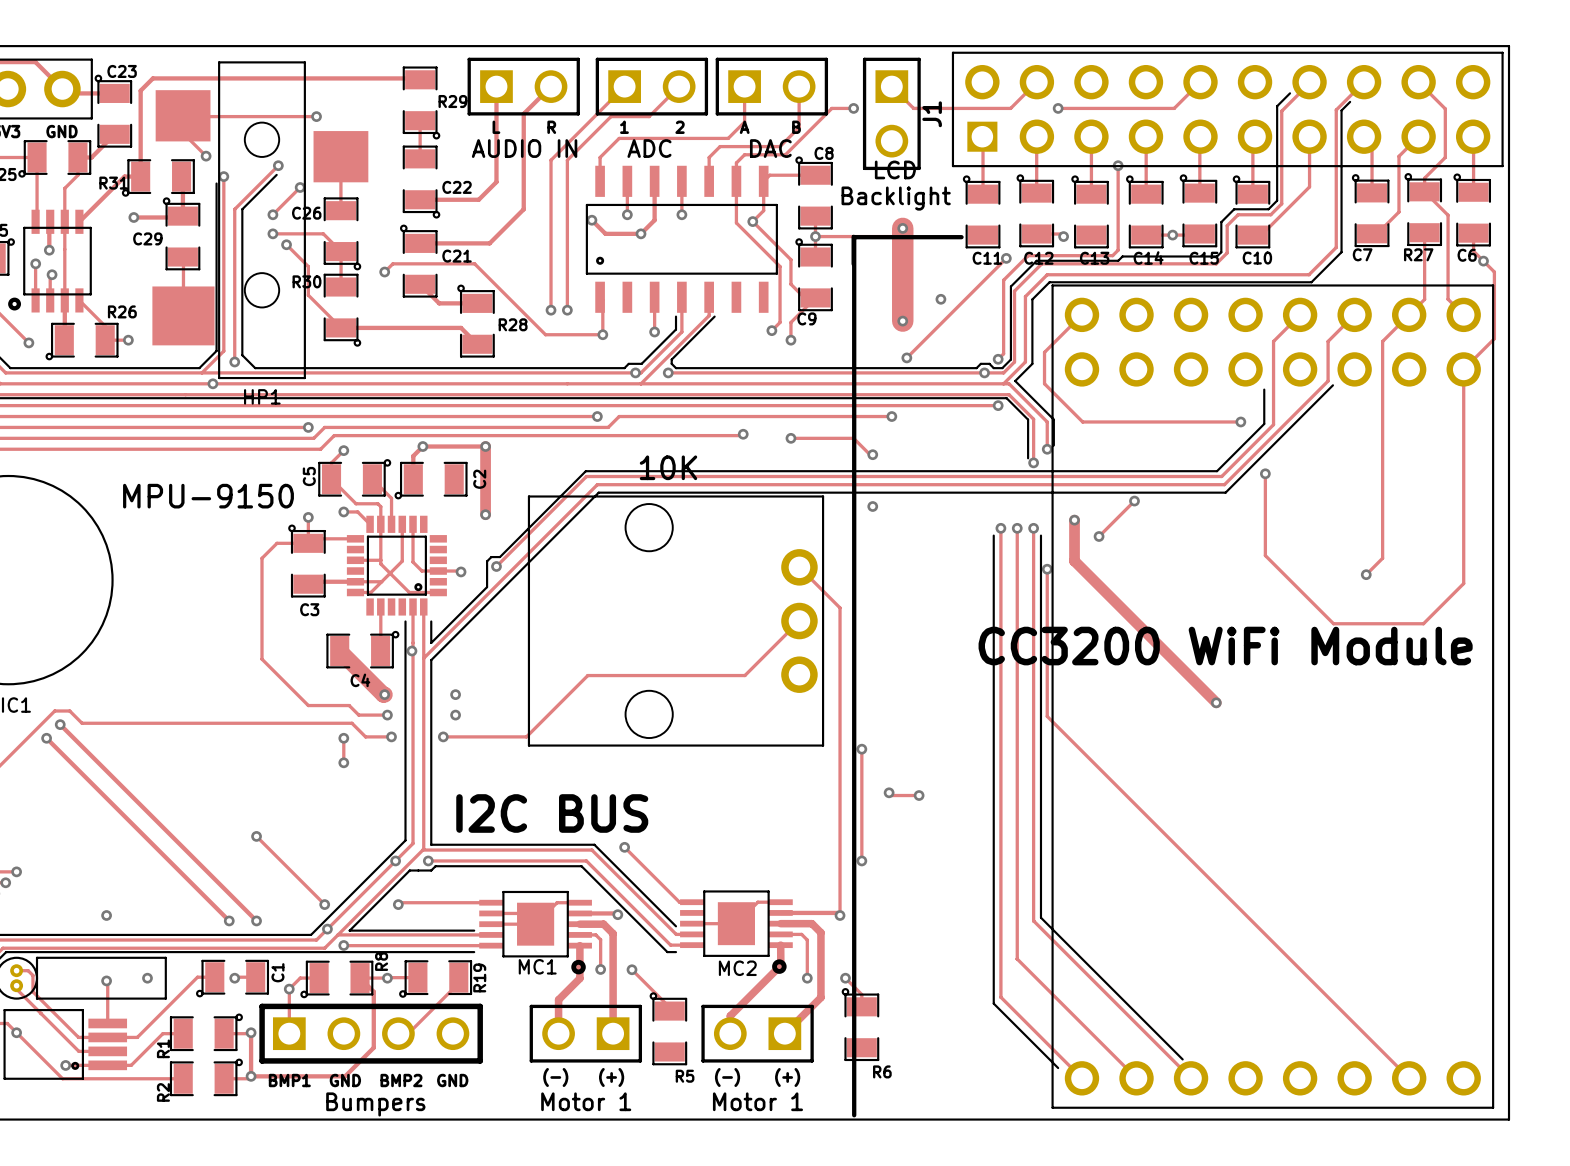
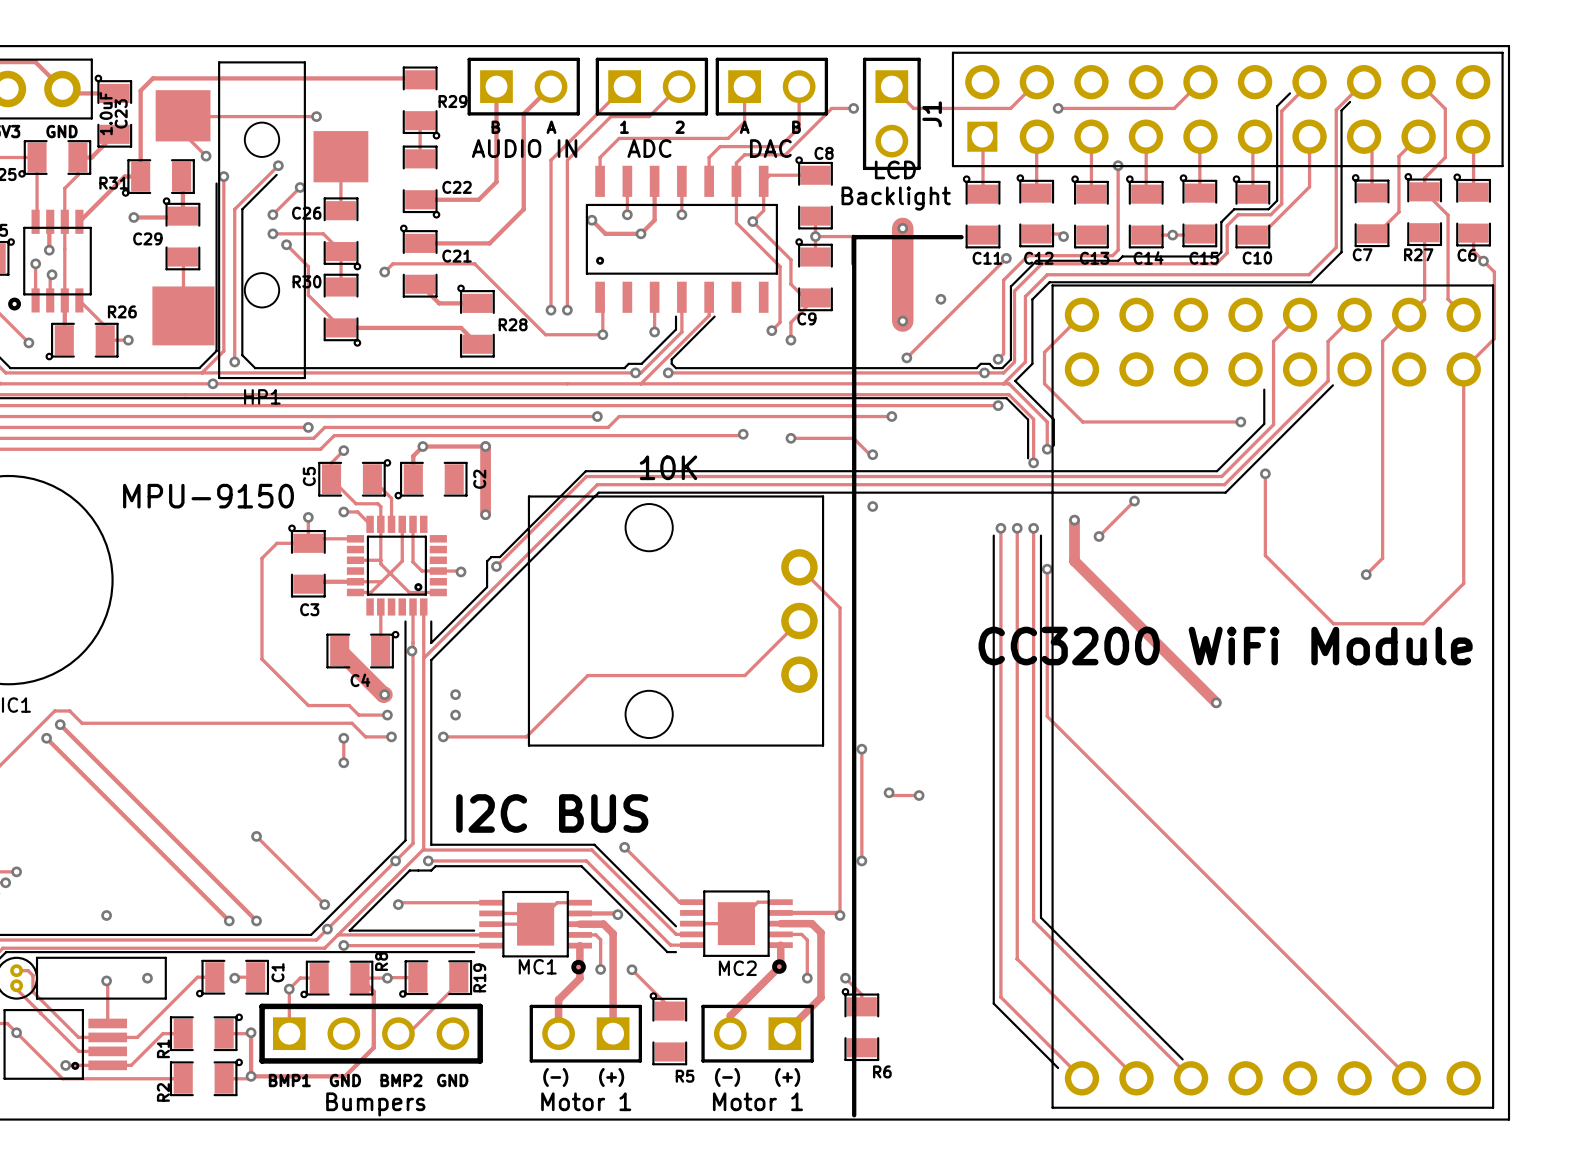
C23 name rotation: 0° (122, 71) -> 90° counterclockwise (121, 113)
C23 name position: C23 (122, 71) -> C23 (121, 113)
C23 value: none -> 1.0uF (106, 113)
text: L (496, 127) -> B (495, 127)
text: R (551, 127) -> A (551, 127)

